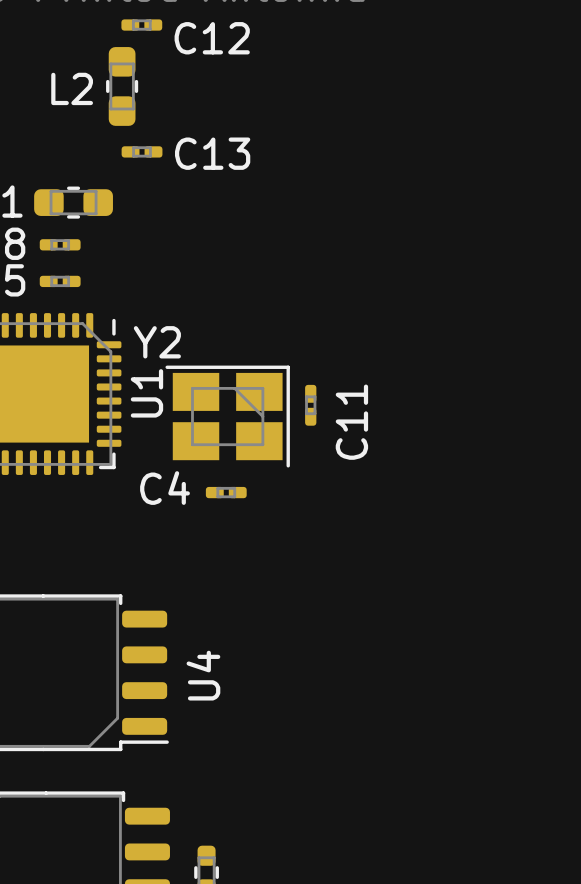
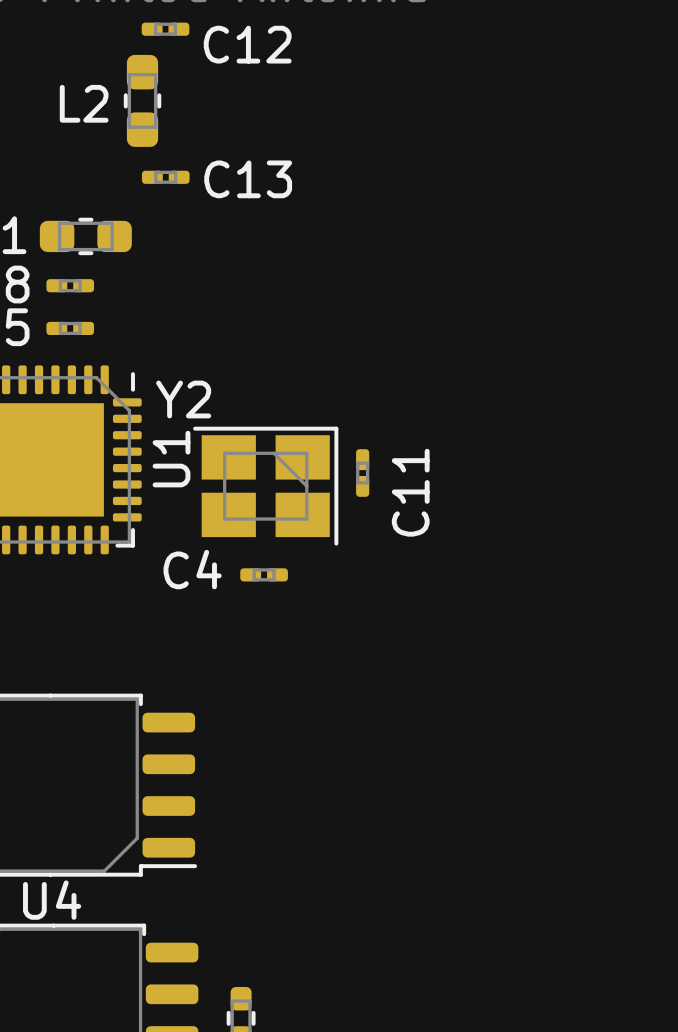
U4 name rotation: 0° (203, 675) -> 90° clockwise (52, 900)
U4 name position: U4 (203, 675) -> U4 (52, 900)

